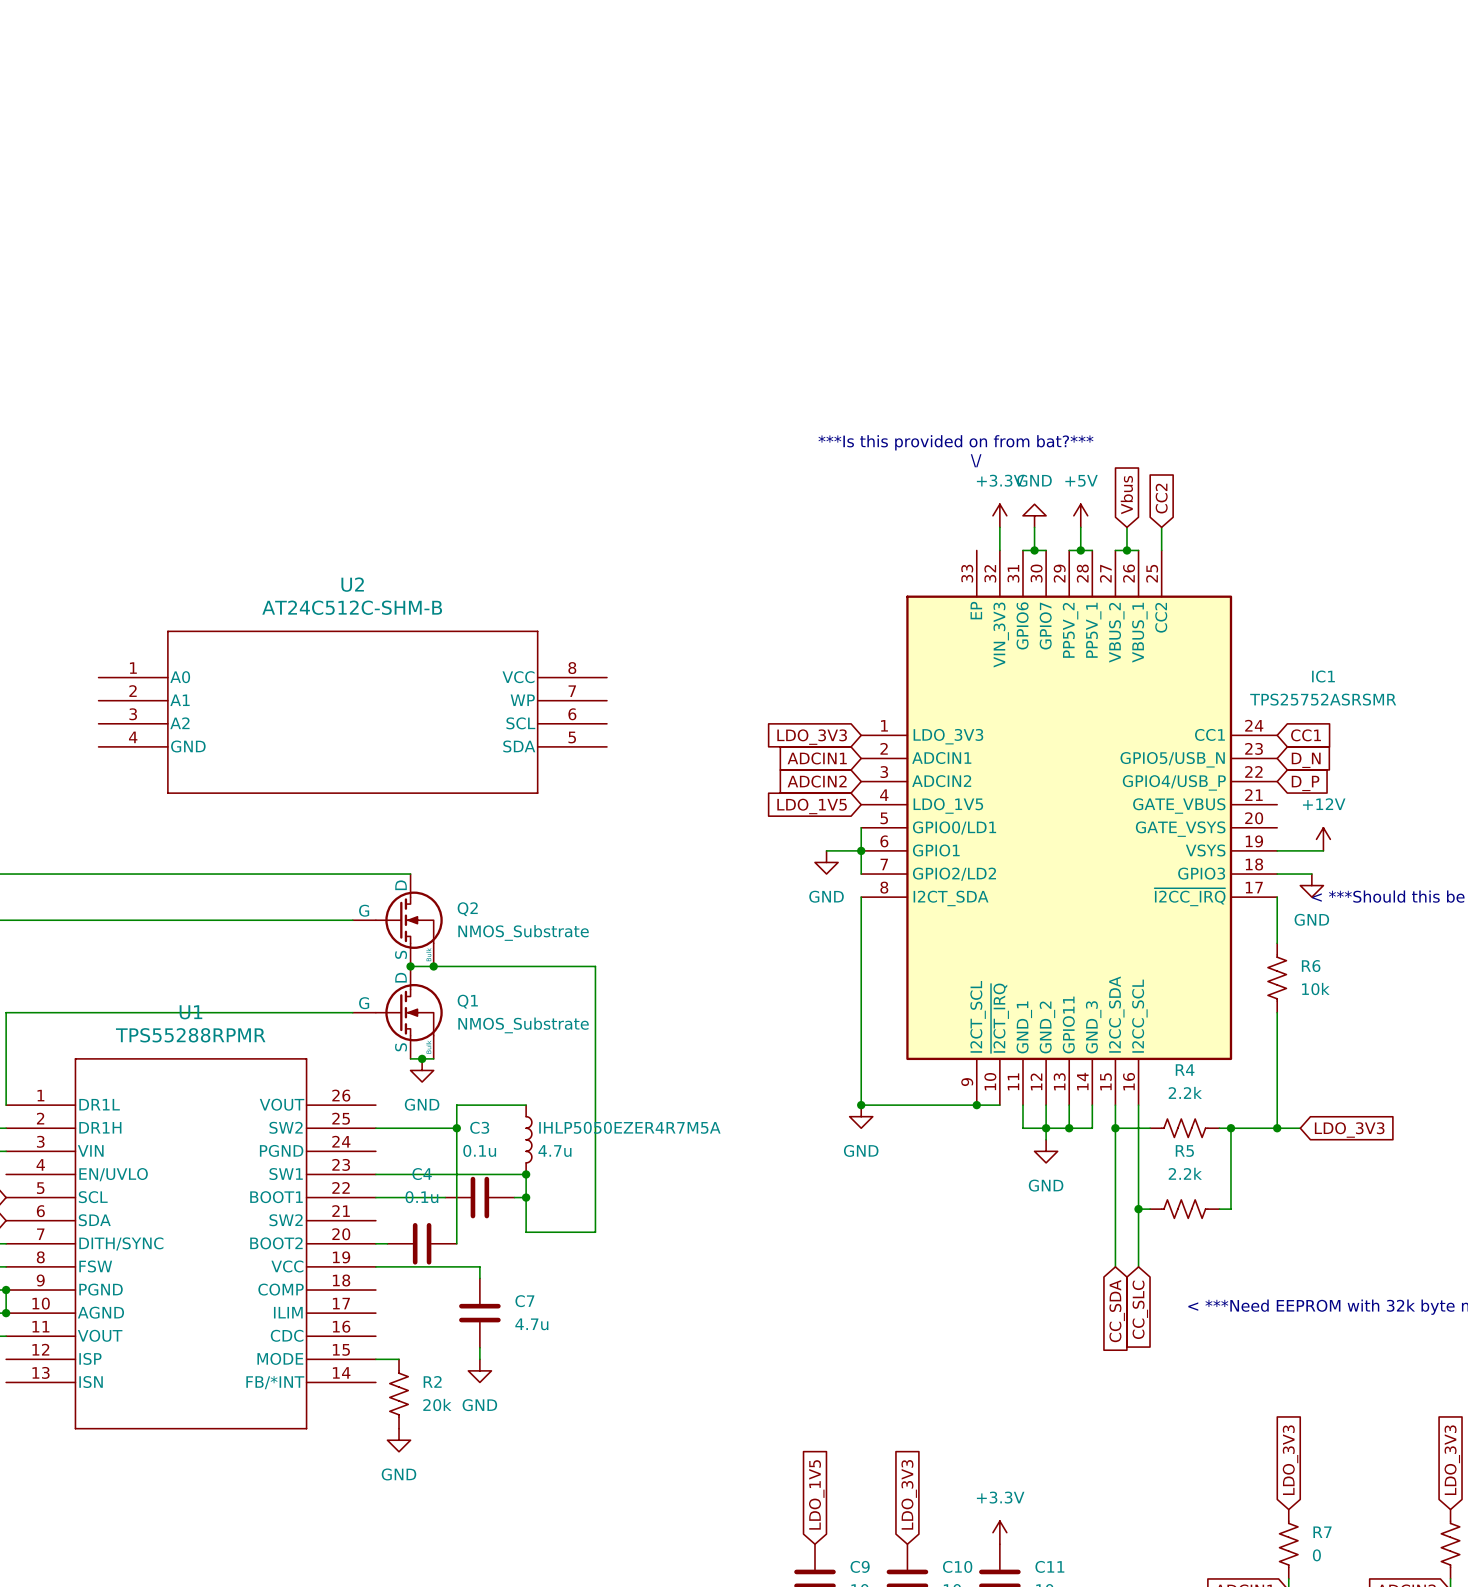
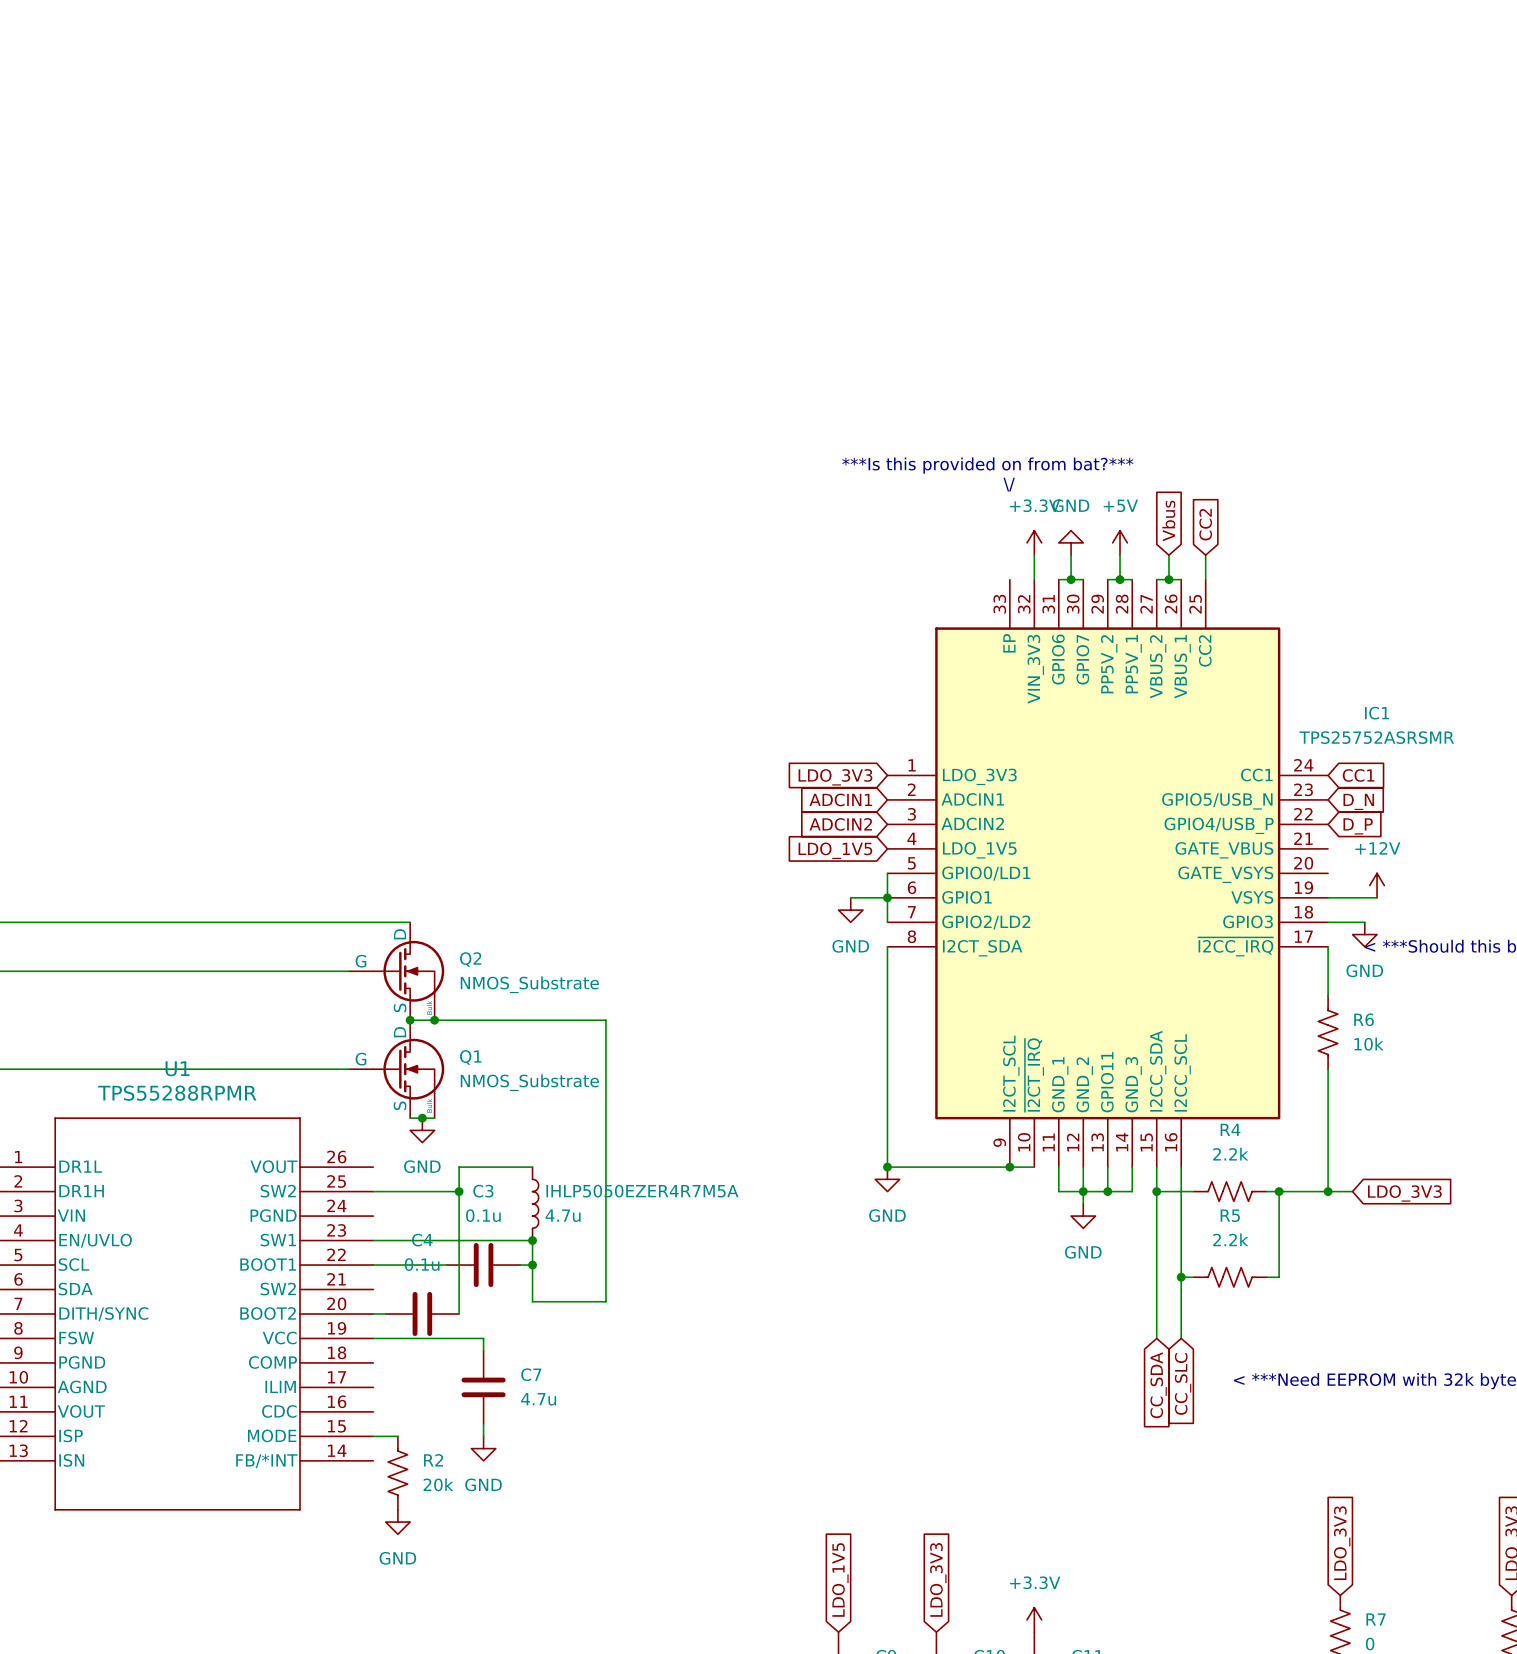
U2: AT24C512C-SHM-B (352, 712) -> none

